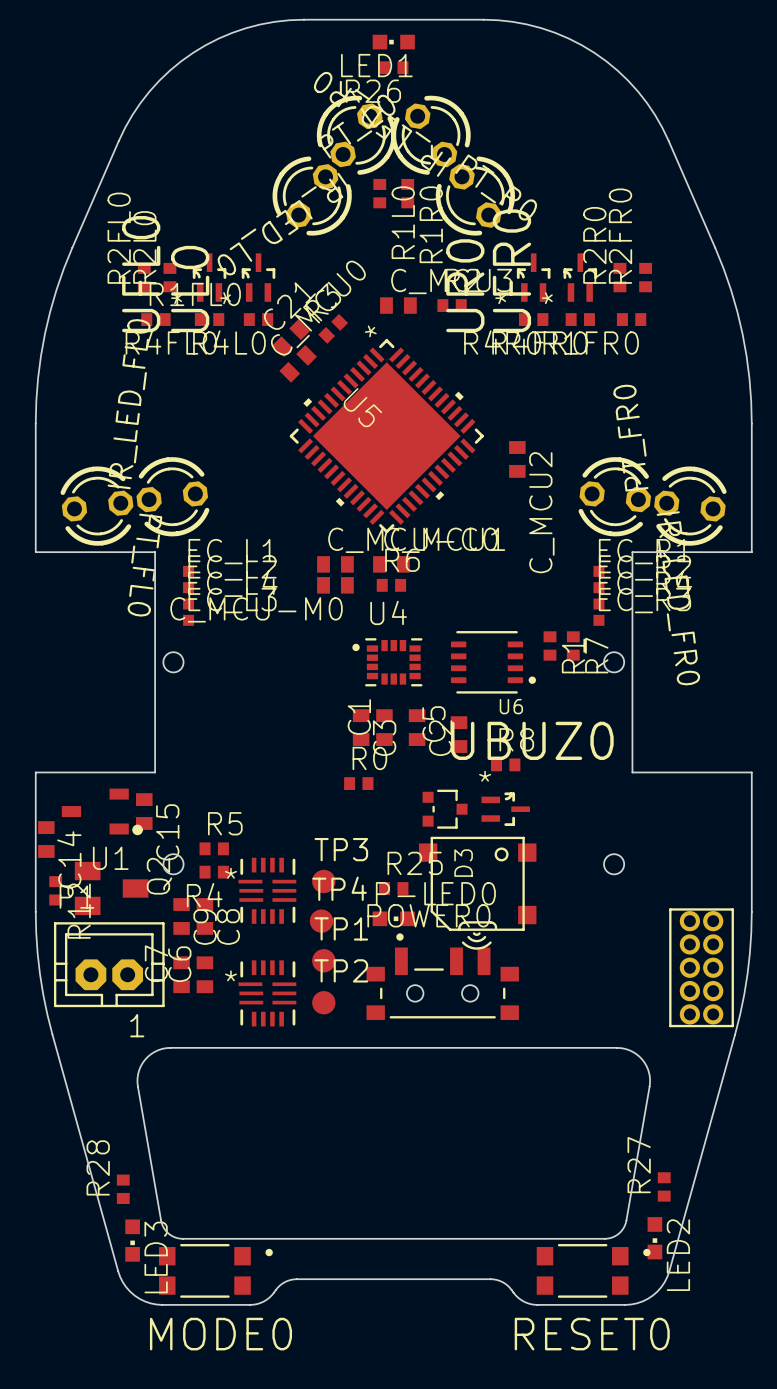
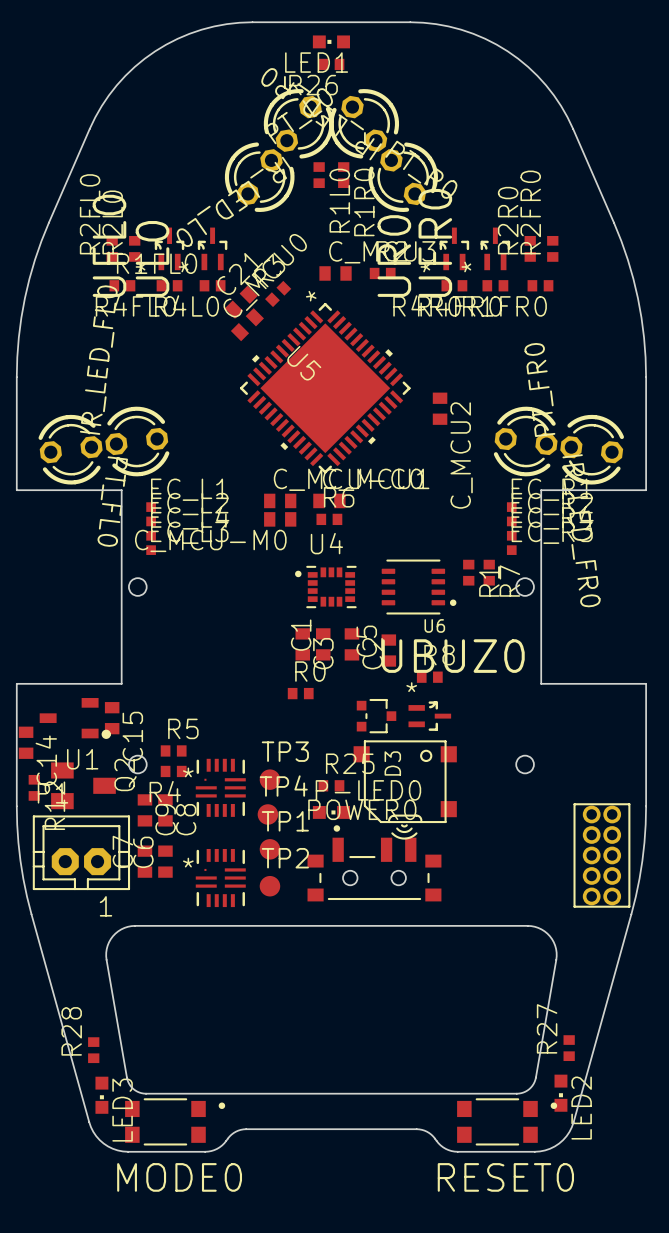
part footprint: [238, 857, 297, 924] -> [195, 758, 246, 817]
part footprint: [238, 960, 297, 1027] -> [195, 848, 246, 908]

